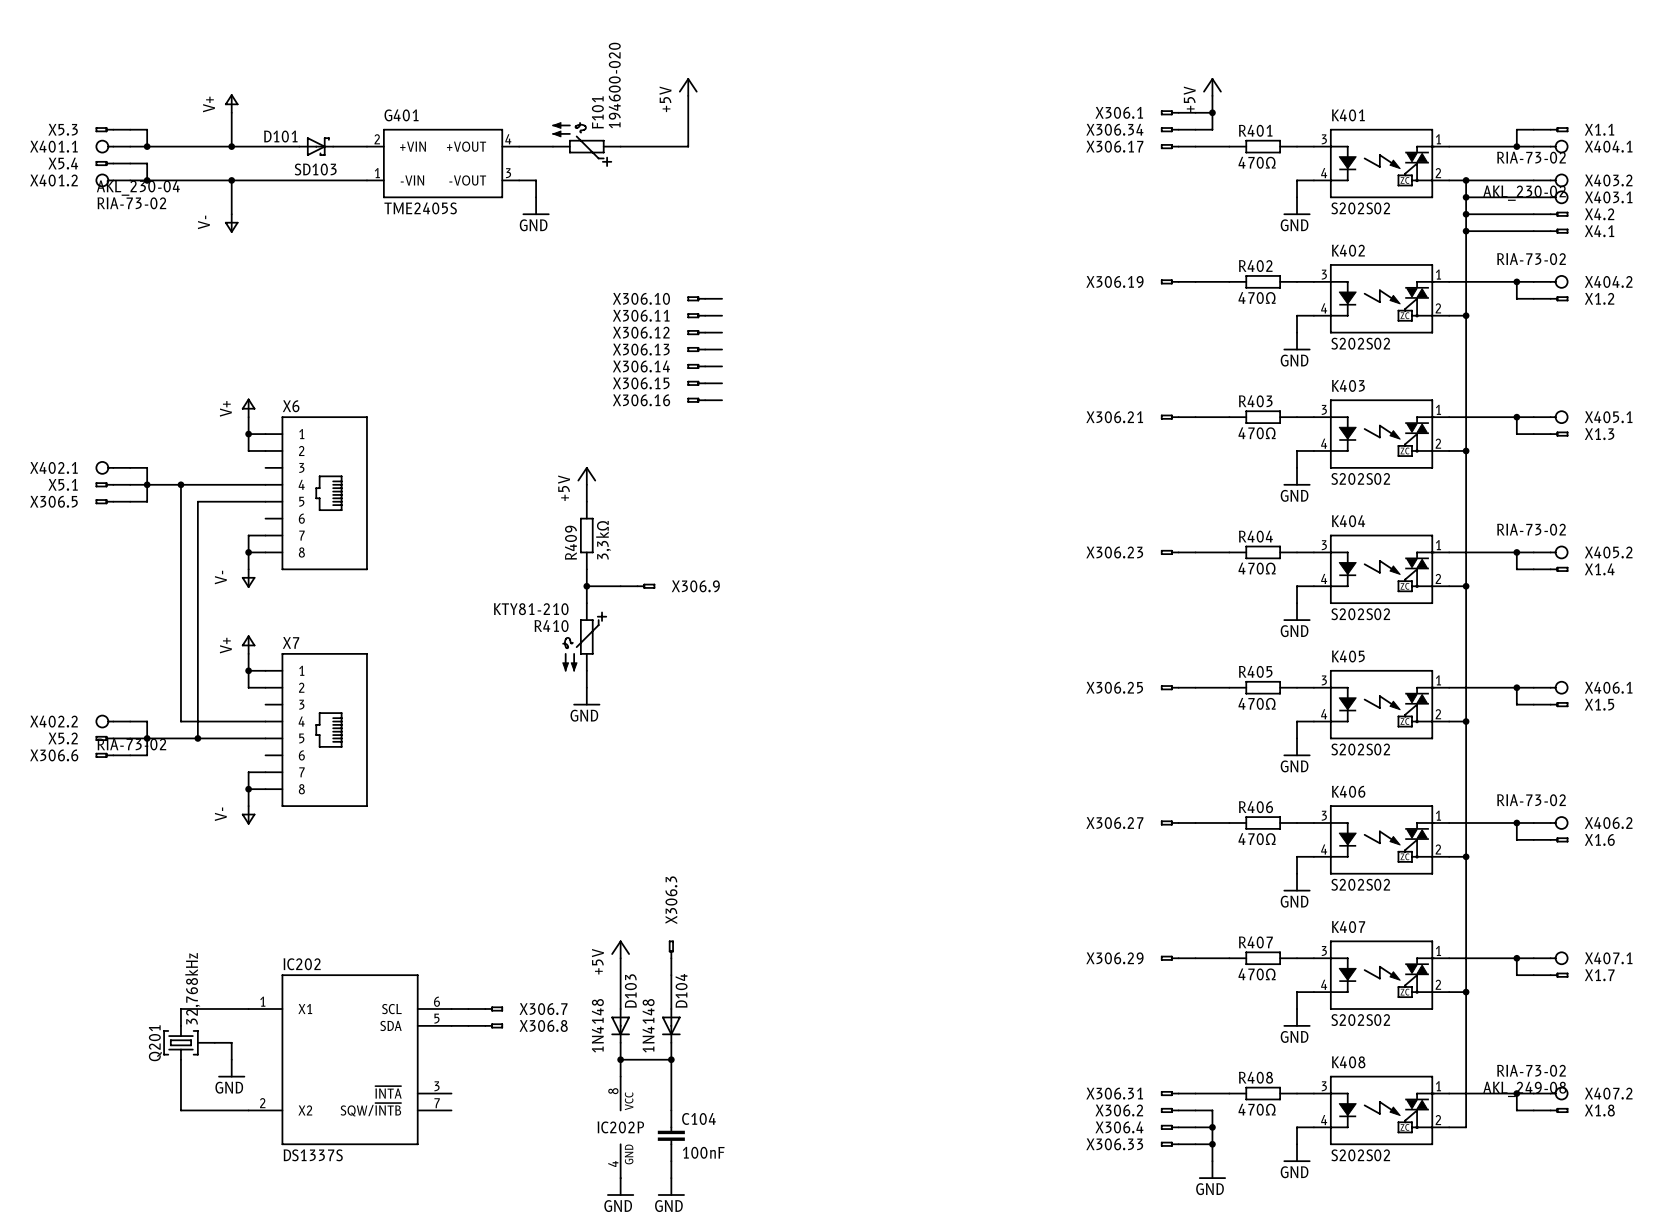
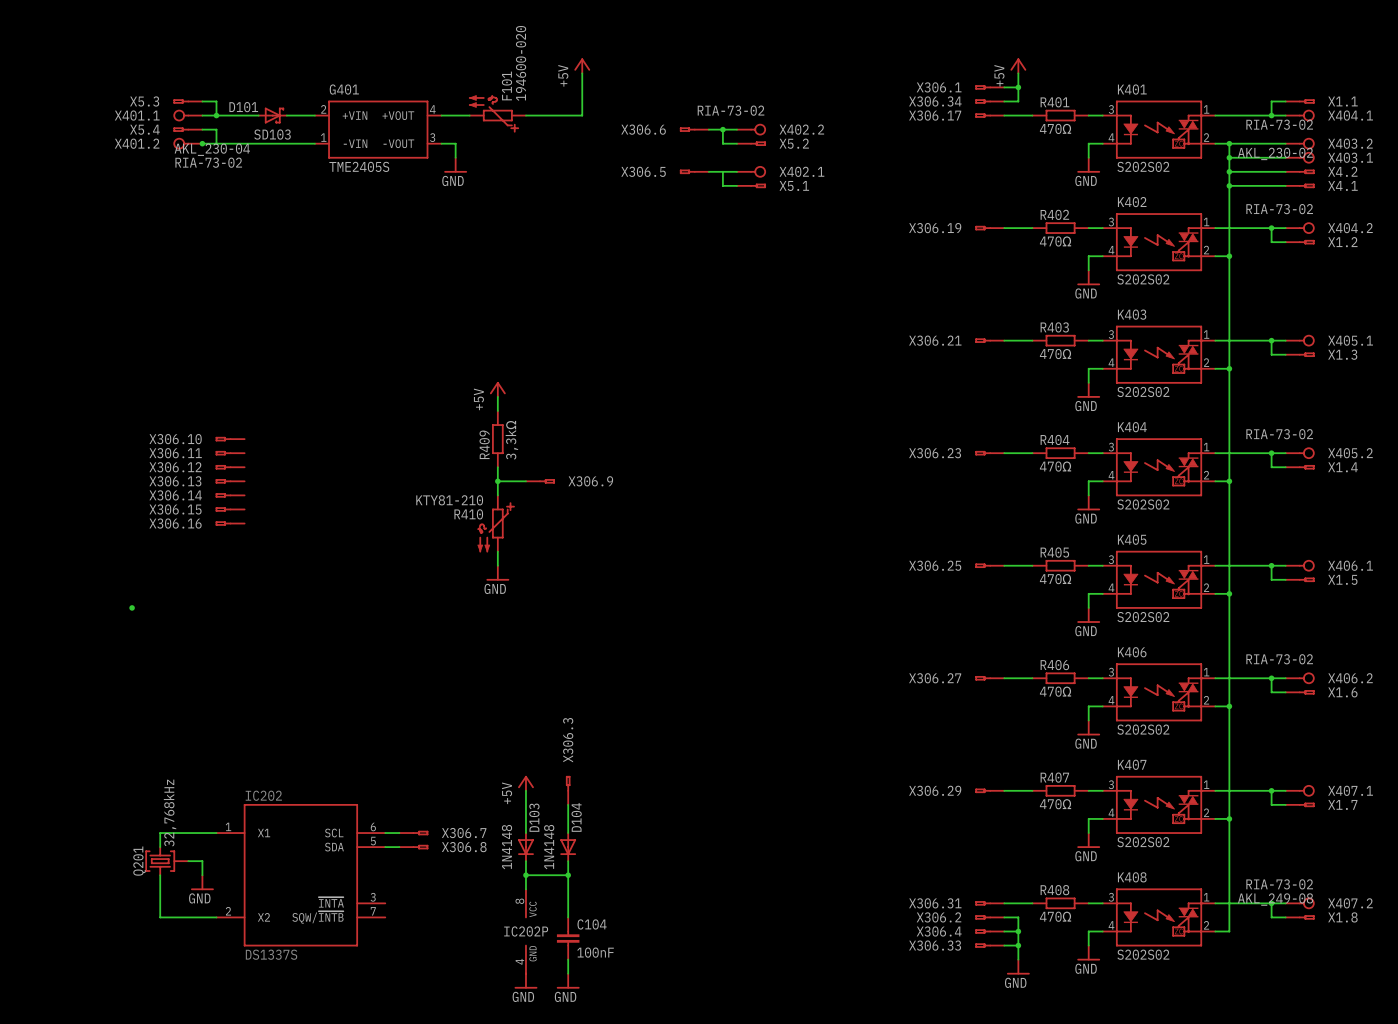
power symbol: V+ (231, 103) -> none
wire: (231, 112) (231, 146) (130, 146) -> none
X5.3 position: (112, 129) -> (188, 101)
wire: (130, 129) (147, 129) (147, 146) -> (202, 101) (216, 101) (216, 115)
X401.1 position: (112, 146) -> (187, 115)
junction: (147, 146) -> none
junction position: (231, 146) -> (216, 115)
X5.4 position: (112, 163) -> (188, 129)
wire: (130, 163) (147, 163) (147, 180) -> (202, 129) (216, 129) (216, 143)
wire: none -> (708, 129) (737, 129)
wire: none -> (722, 129) (722, 143) (737, 143)
junction: none -> (722, 129)
X401.2 position: (112, 180) -> (187, 143)
wire: (130, 180) (231, 180) (231, 214) -> none
junction: (147, 180) -> none
wire: none -> (708, 171) (737, 171)
wire: none -> (722, 171) (722, 185) (737, 185)
power symbol: V- (231, 223) -> none
X306.10 position: (704, 298) -> (230, 439)
X306.11 position: (704, 315) -> (230, 453)
X306.12 position: (704, 332) -> (230, 467)
X306.13 position: (704, 349) -> (230, 481)
X306.14 position: (704, 366) -> (230, 495)
X306.15 position: (704, 383) -> (230, 509)
X306.16 position: (704, 400) -> (230, 523)
power symbol: V+ (248, 407) -> none
wire: (248, 417) (248, 450) (265, 450) -> none
wire: (248, 434) (265, 434) -> none
junction: (248, 434) -> none
X402.1 rotation: 0° (104, 467) -> 180° (758, 171)
X402.1 position: (112, 467) -> (751, 171)
wire: (130, 467) (147, 467) (147, 501) (130, 501) -> none
X5.1 rotation: 0° (104, 484) -> 180° (758, 185)
X5.1 position: (112, 484) -> (751, 185)
wire: (130, 484) (265, 484) -> none
junction: (147, 484) -> none
wire: (180, 484) (180, 721) (265, 721) -> none
junction: (180, 484) -> none
X6: (316, 493) -> none
X306.5 position: (112, 501) -> (694, 171)
wire: (265, 501) (197, 501) (197, 738) -> none
wire: (265, 535) (248, 535) (248, 569) -> none
junction: (248, 552) -> none
power symbol: V- (248, 578) -> none
power symbol: V+ (248, 644) -> none
wire: (248, 653) (248, 687) (265, 687) -> none
wire: (248, 670) (265, 670) -> none
junction: (248, 670) -> none
X402.2 rotation: 0° (104, 721) -> 180° (758, 129)
X402.2 position: (112, 721) -> (751, 129)
wire: (130, 721) (147, 721) (147, 755) (130, 755) -> none
X7: (316, 729) -> none
X5.2 rotation: 0° (104, 738) -> 180° (758, 143)
X5.2 position: (112, 738) -> (751, 143)
wire: (130, 738) (265, 738) -> none
junction: (197, 738) -> none
X306.6 position: (112, 755) -> (694, 129)
wire: (265, 772) (248, 772) (248, 806) -> none
wire: (248, 789) (265, 789) -> none
junction: (248, 789) -> none
power symbol: V- (248, 815) -> none

